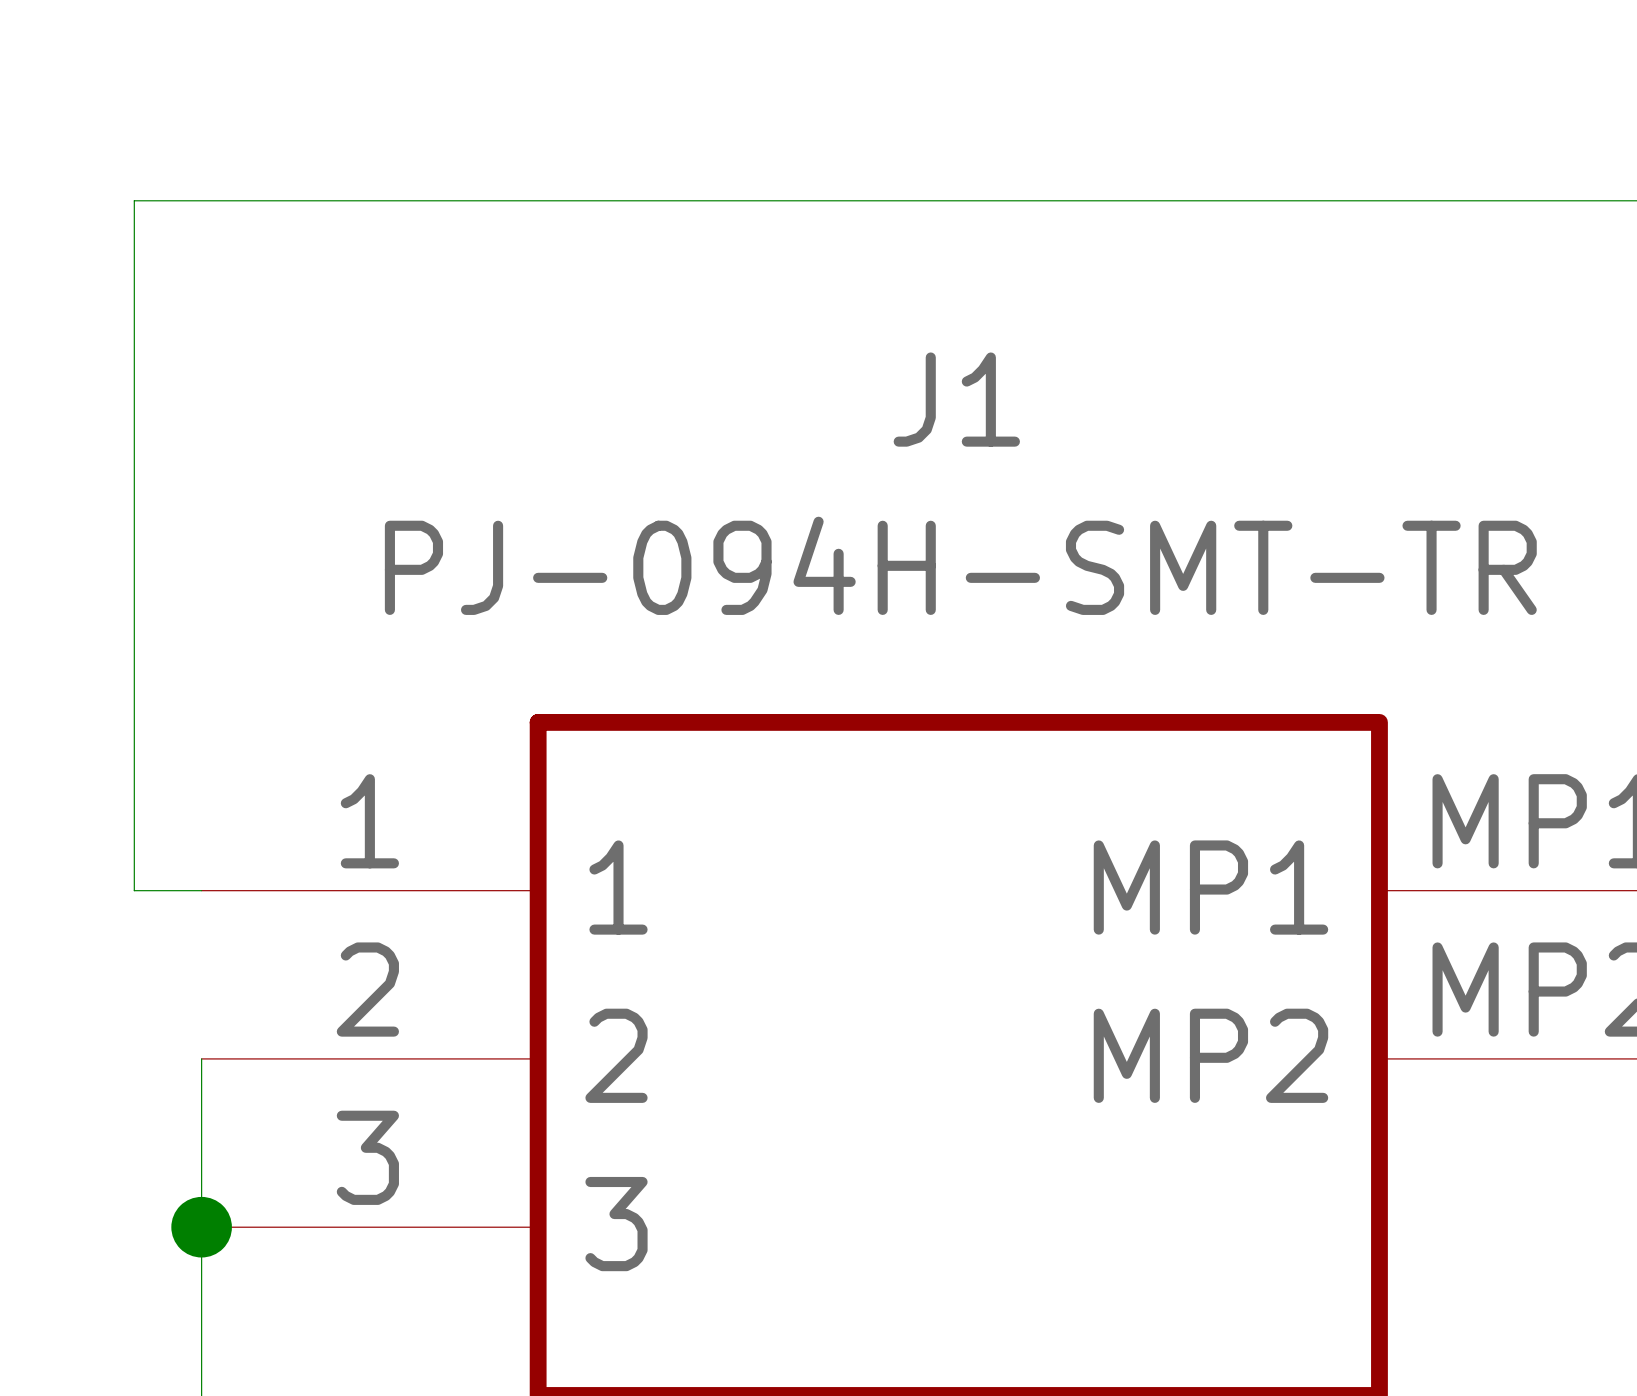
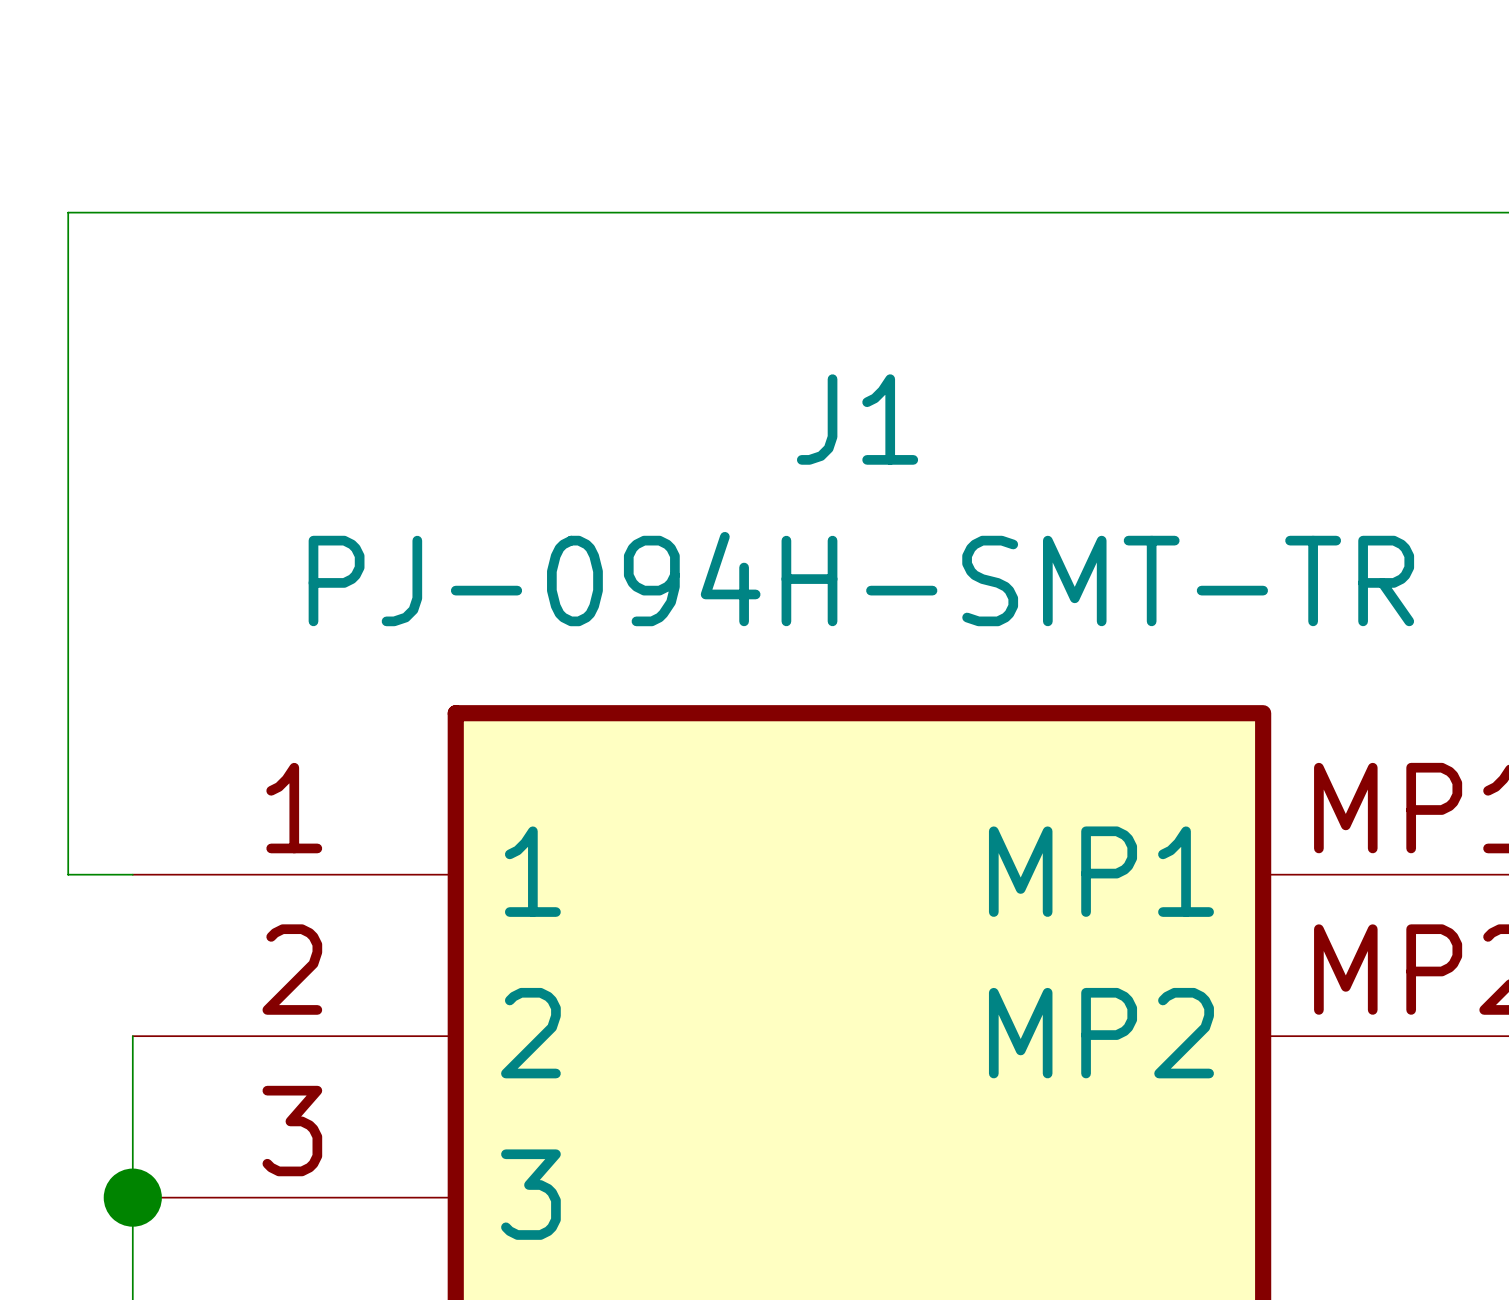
J1 name position: J1 (956, 399) -> J1 (857, 419)
J1 value position: PJ-094H-SMT-TR (960, 565) -> PJ-094H-SMT-TR (861, 579)

